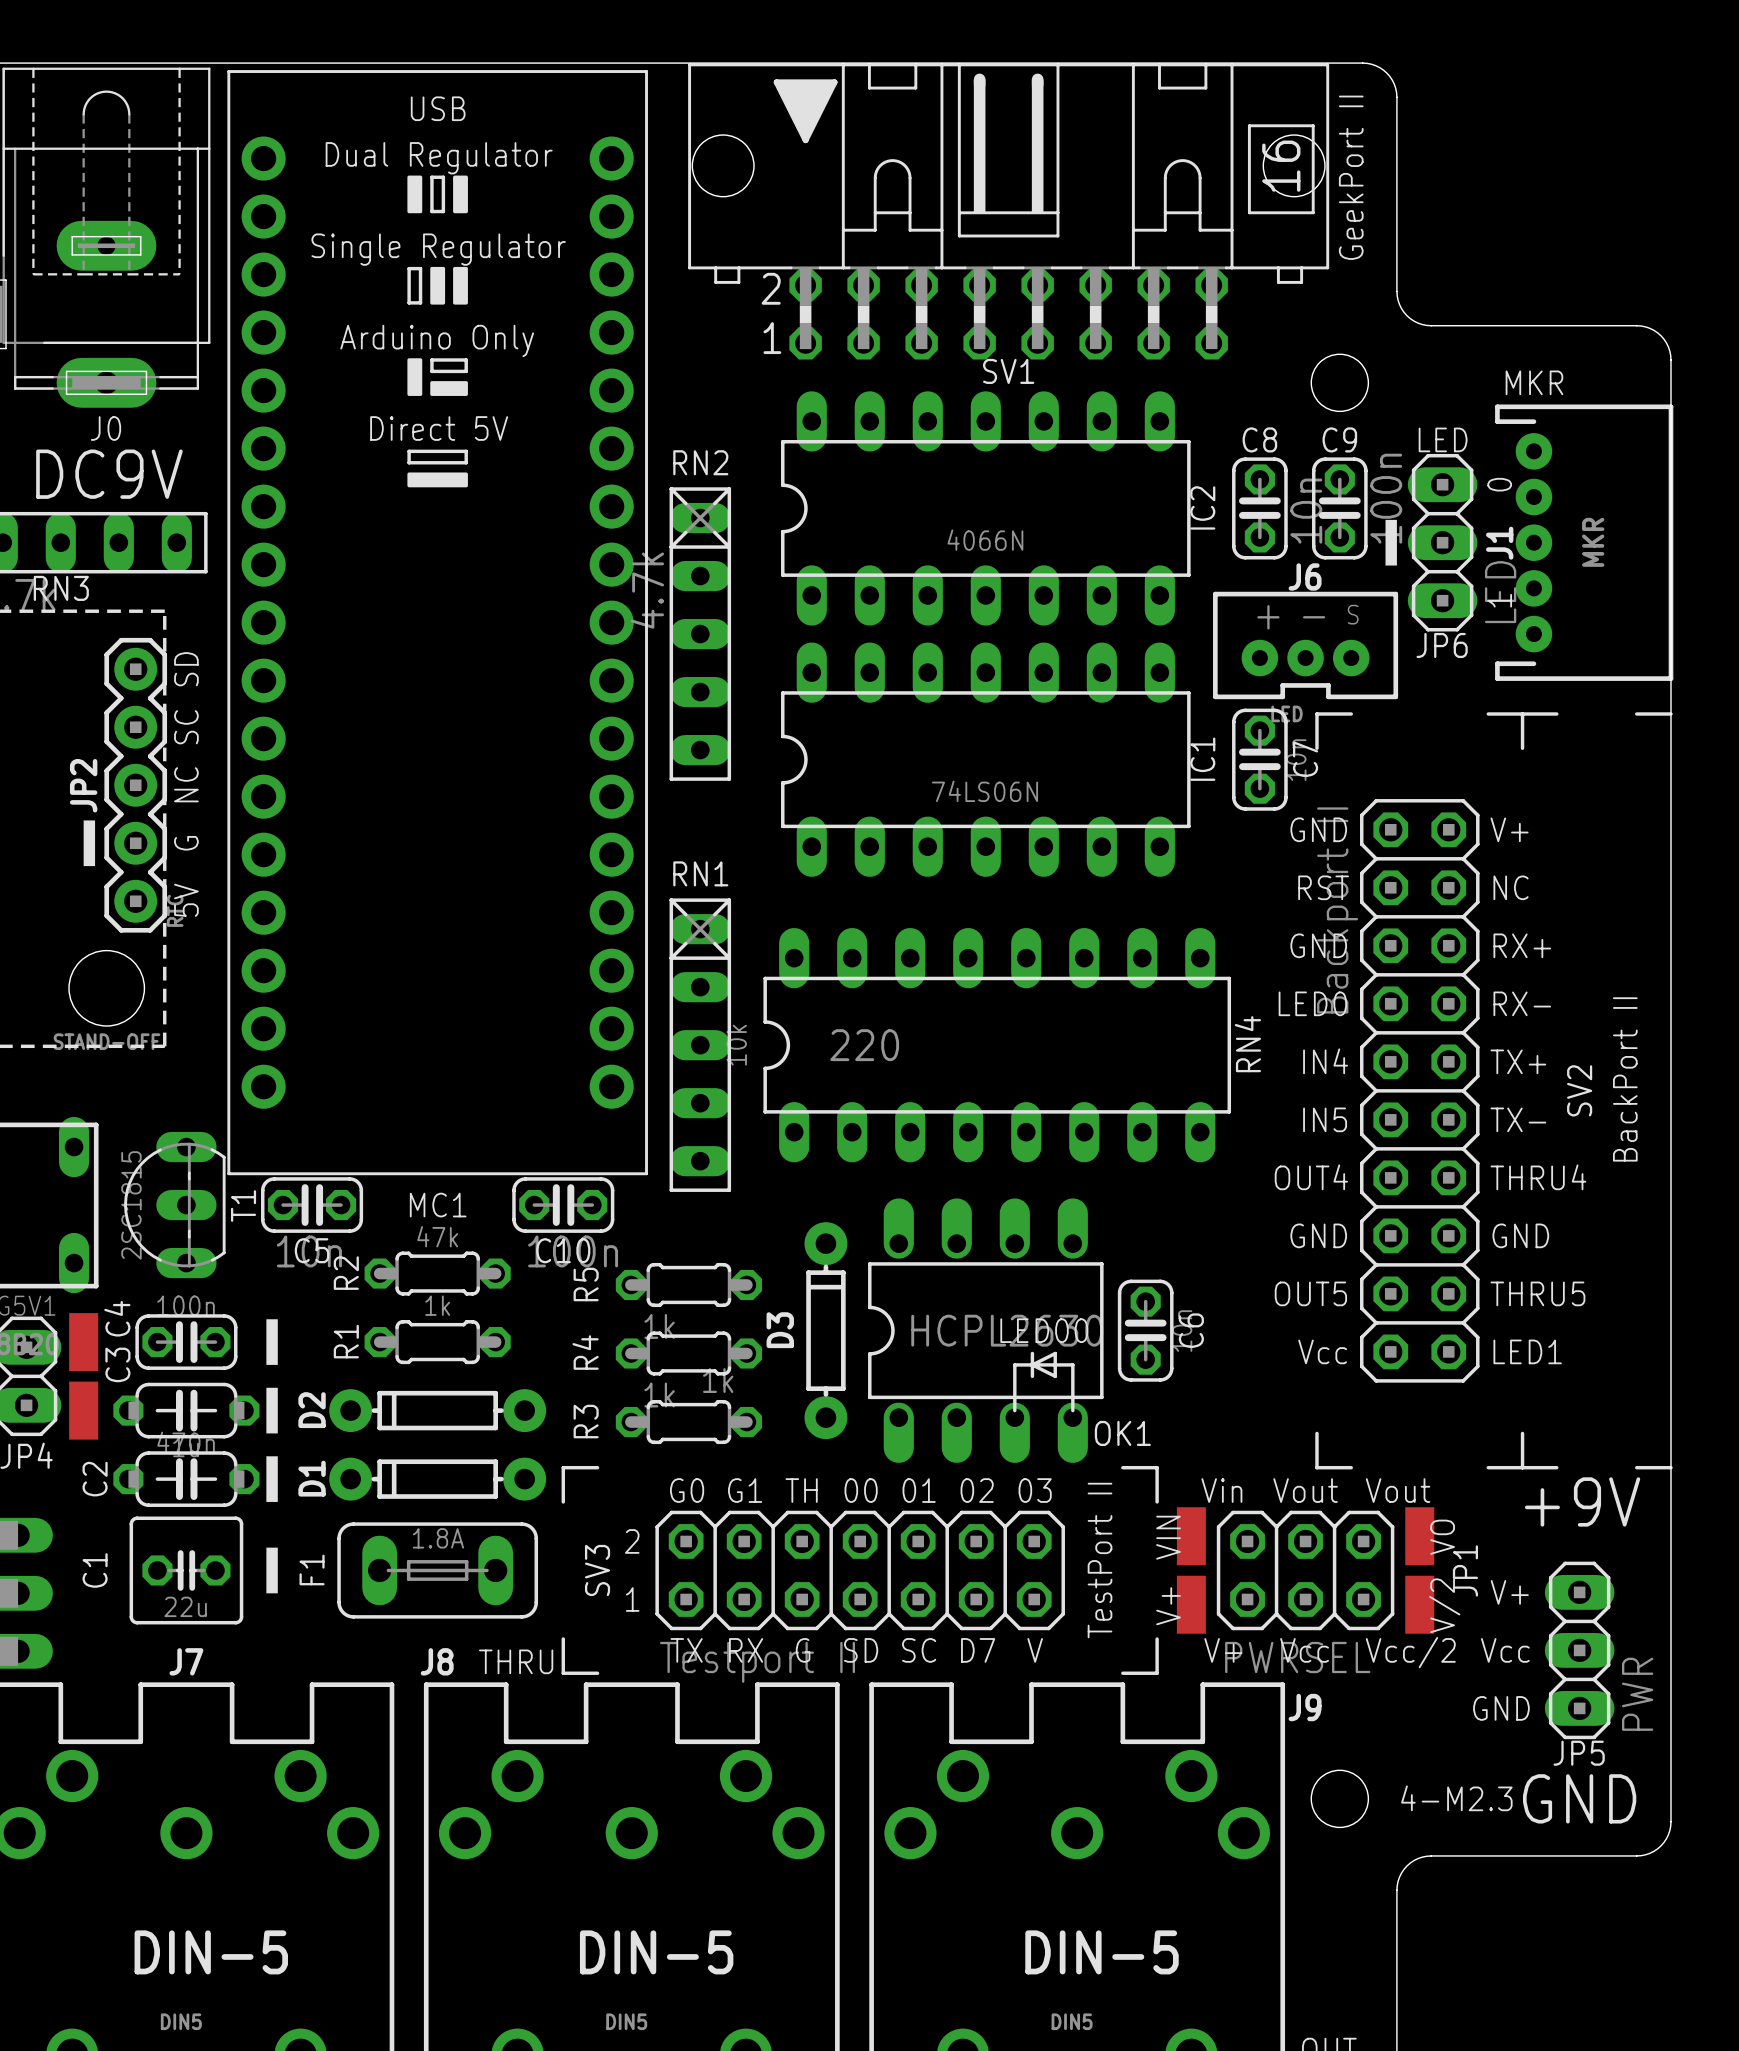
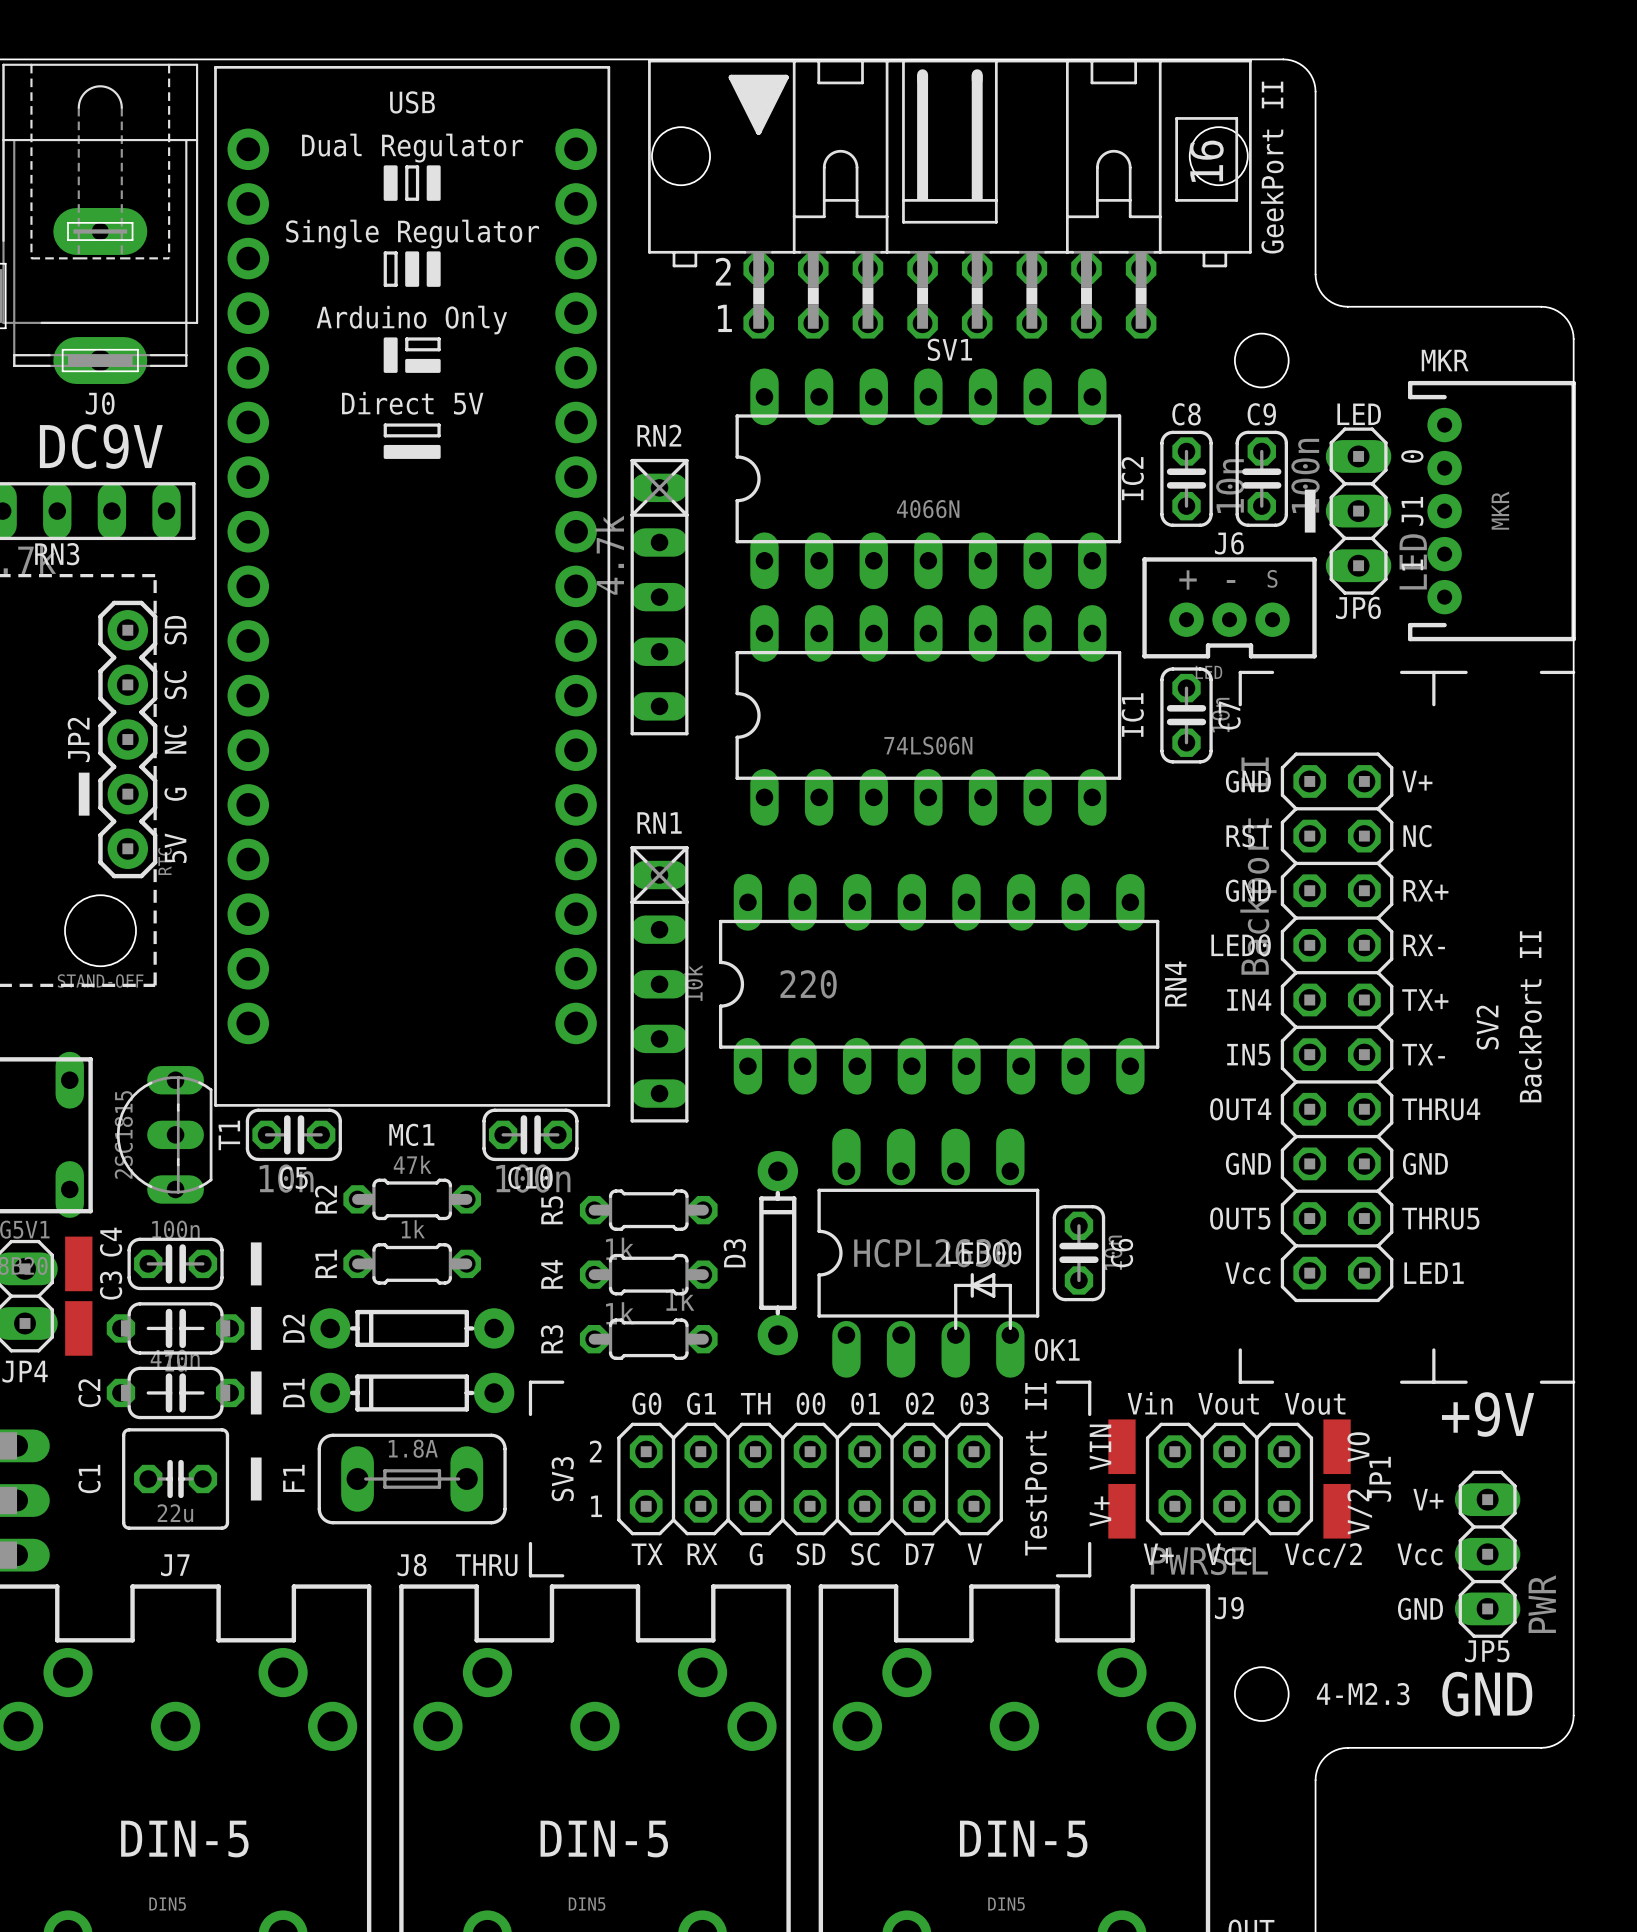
SV3 value: Testport II (757, 1662) -> none

